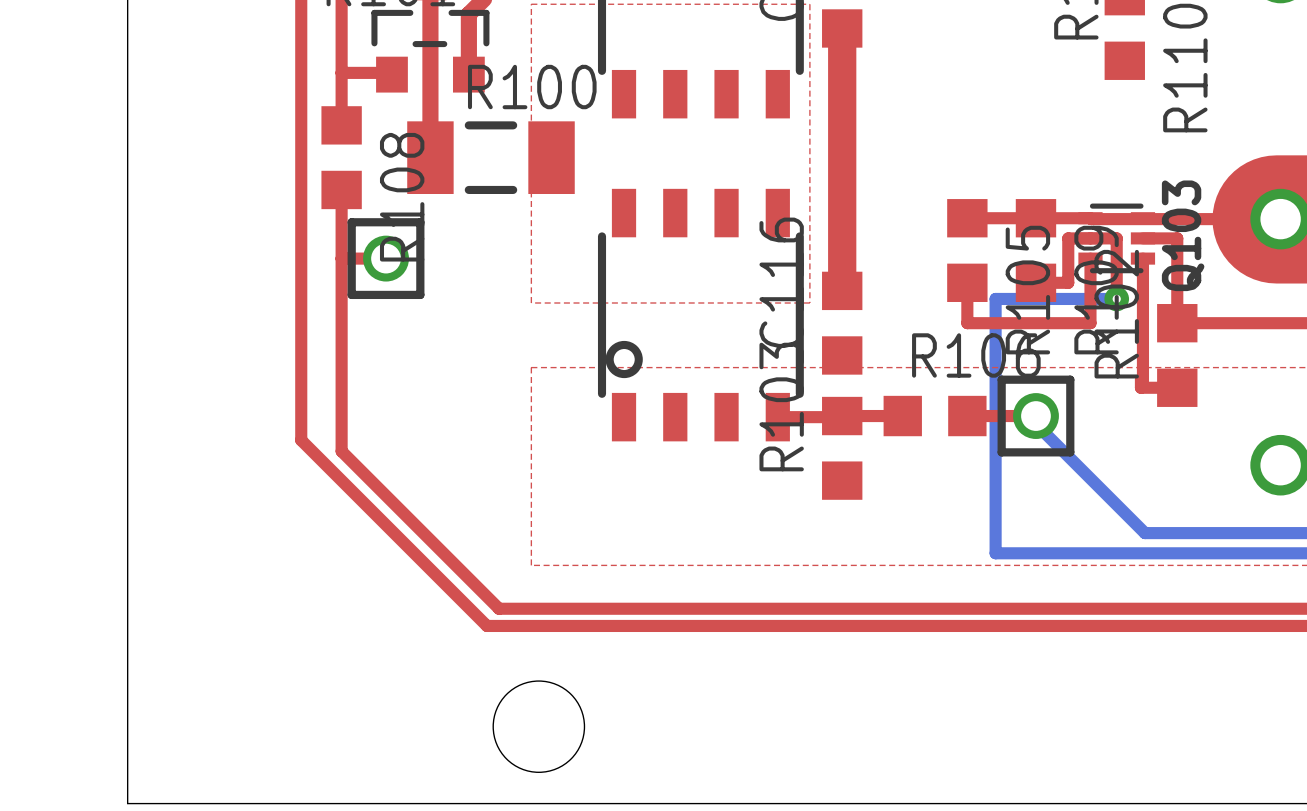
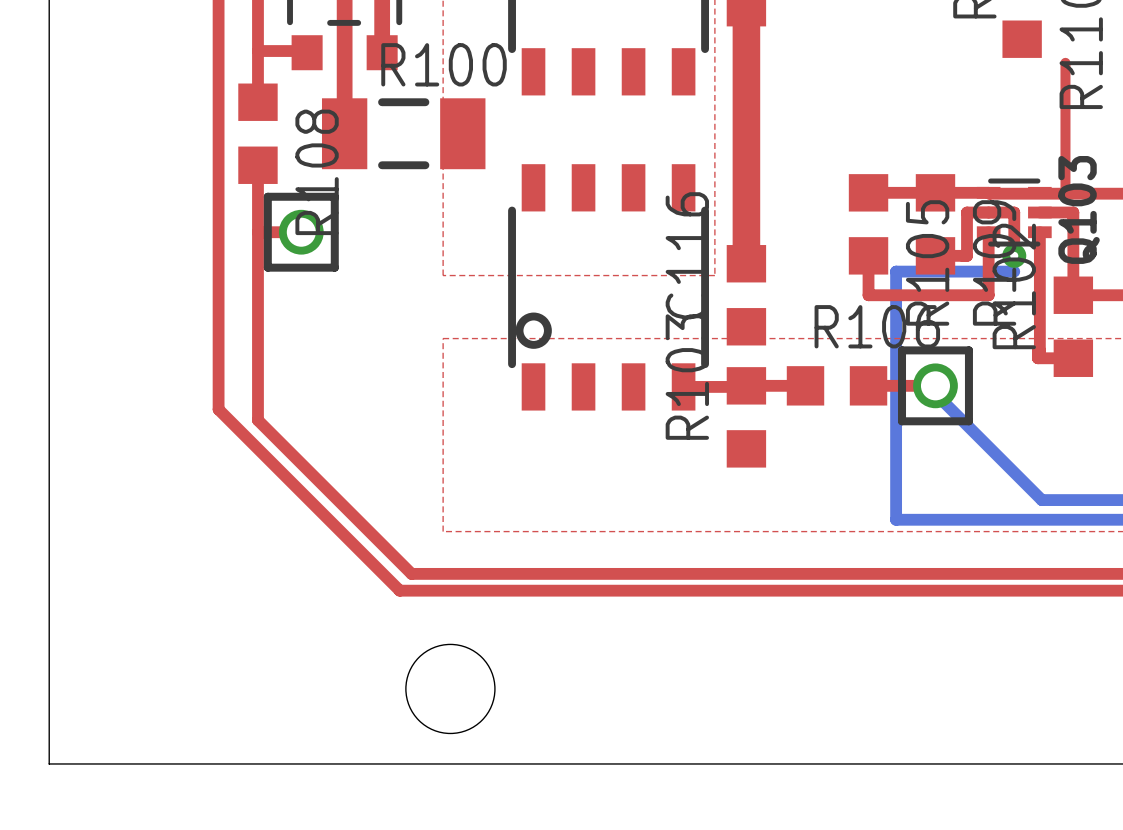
top track: none -> (1065, 62) (1065, 192)
via position: (1116, 298) -> (1014, 255)

